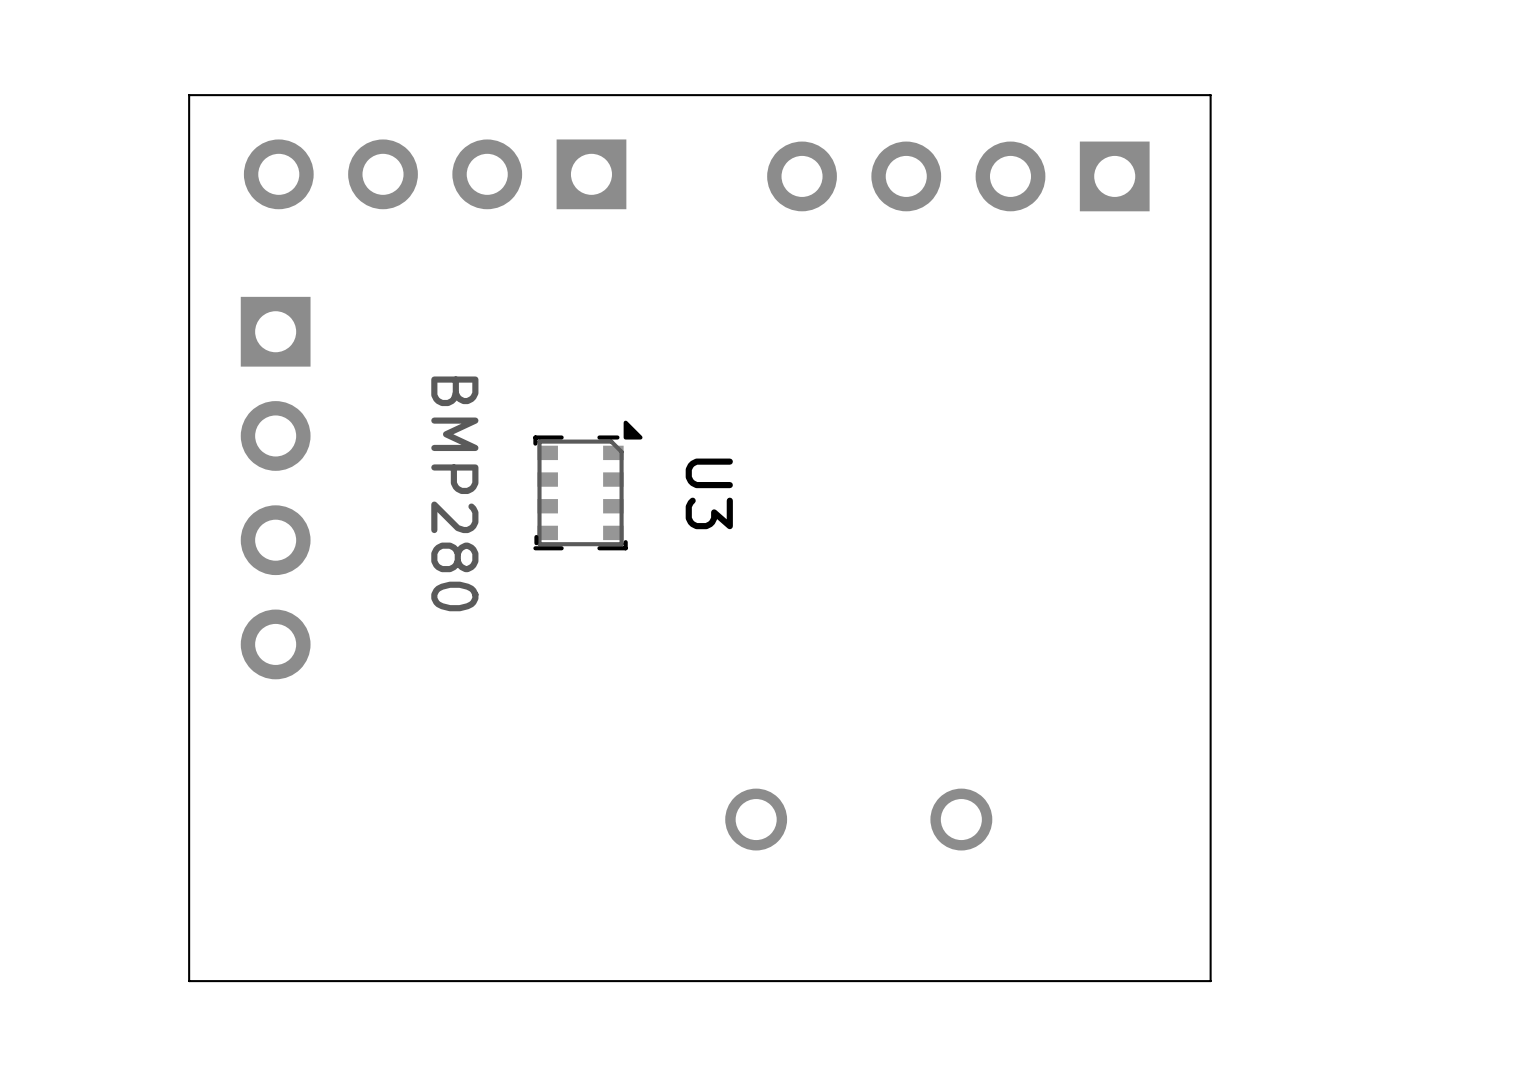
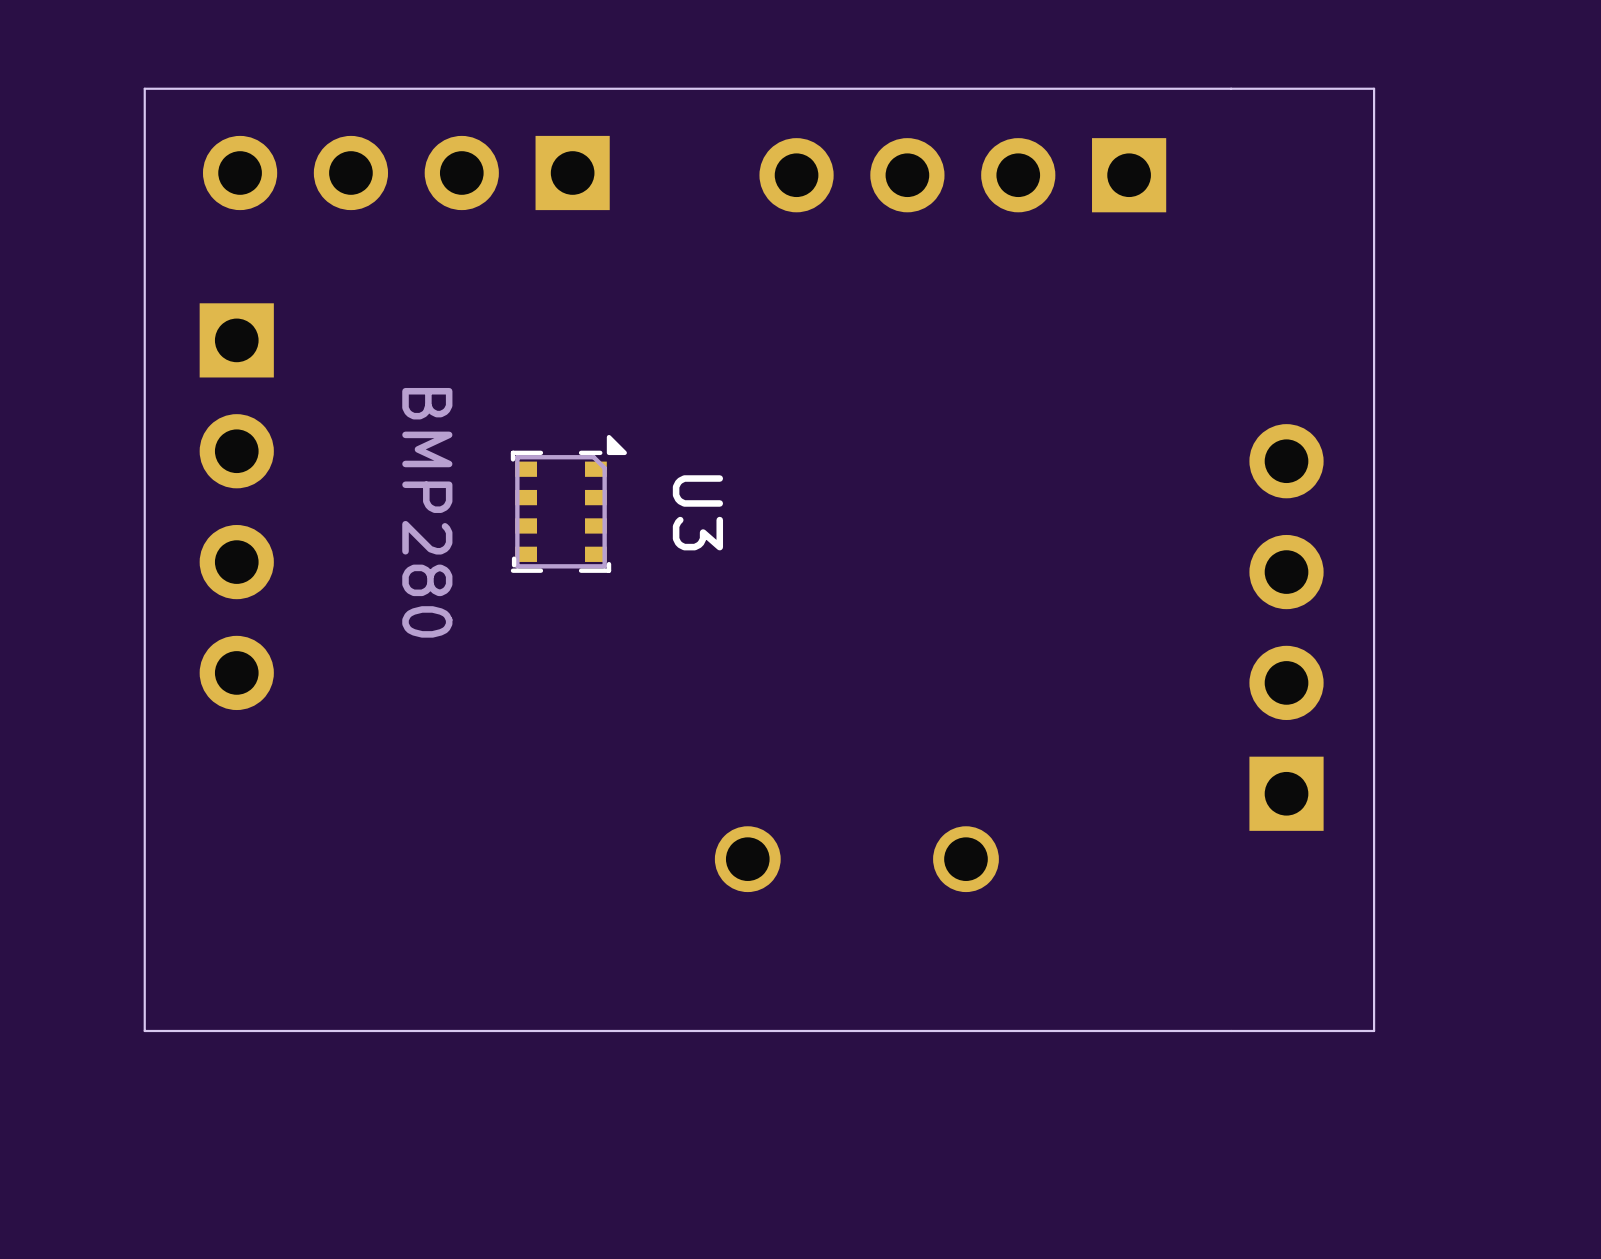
board edge: (1210, 95) (1210, 981) -> (1231, 88) (1374, 88) (1374, 1030) (1231, 1030)
part: none -> (1286, 627)

